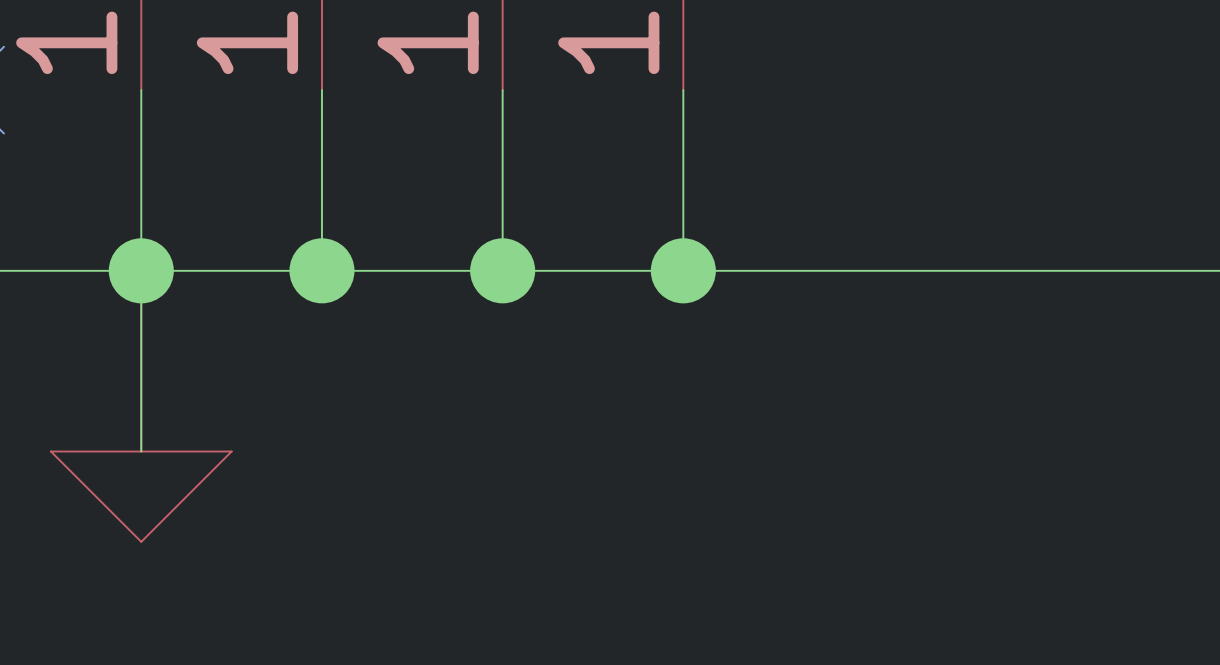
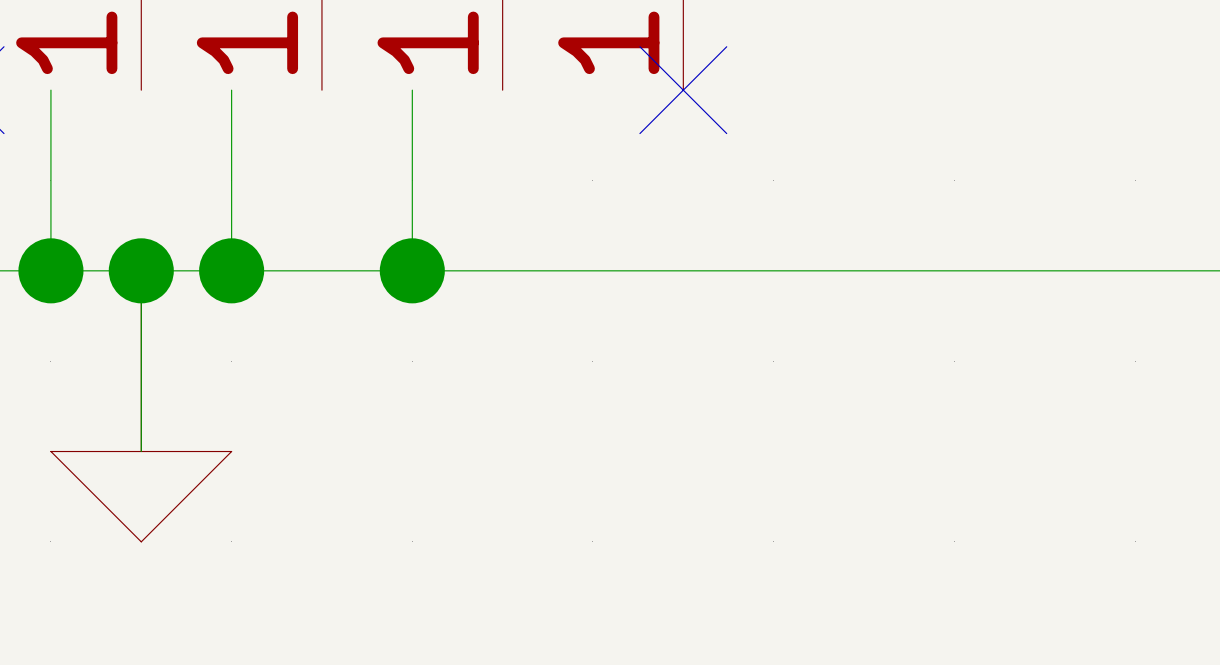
wire: (141, 90) (141, 270) -> (50, 90) (50, 270)
wire: (321, 90) (321, 270) -> (231, 90) (231, 270)
wire: (502, 90) (502, 270) -> (412, 90) (412, 270)
wire: (683, 90) (683, 270) -> none
no-connect mark: none -> (683, 90)
junction: none -> (50, 270)
junction: none -> (231, 270)
junction: (321, 270) -> none
junction: none -> (412, 270)
junction: (502, 270) -> none
junction: (683, 270) -> none

